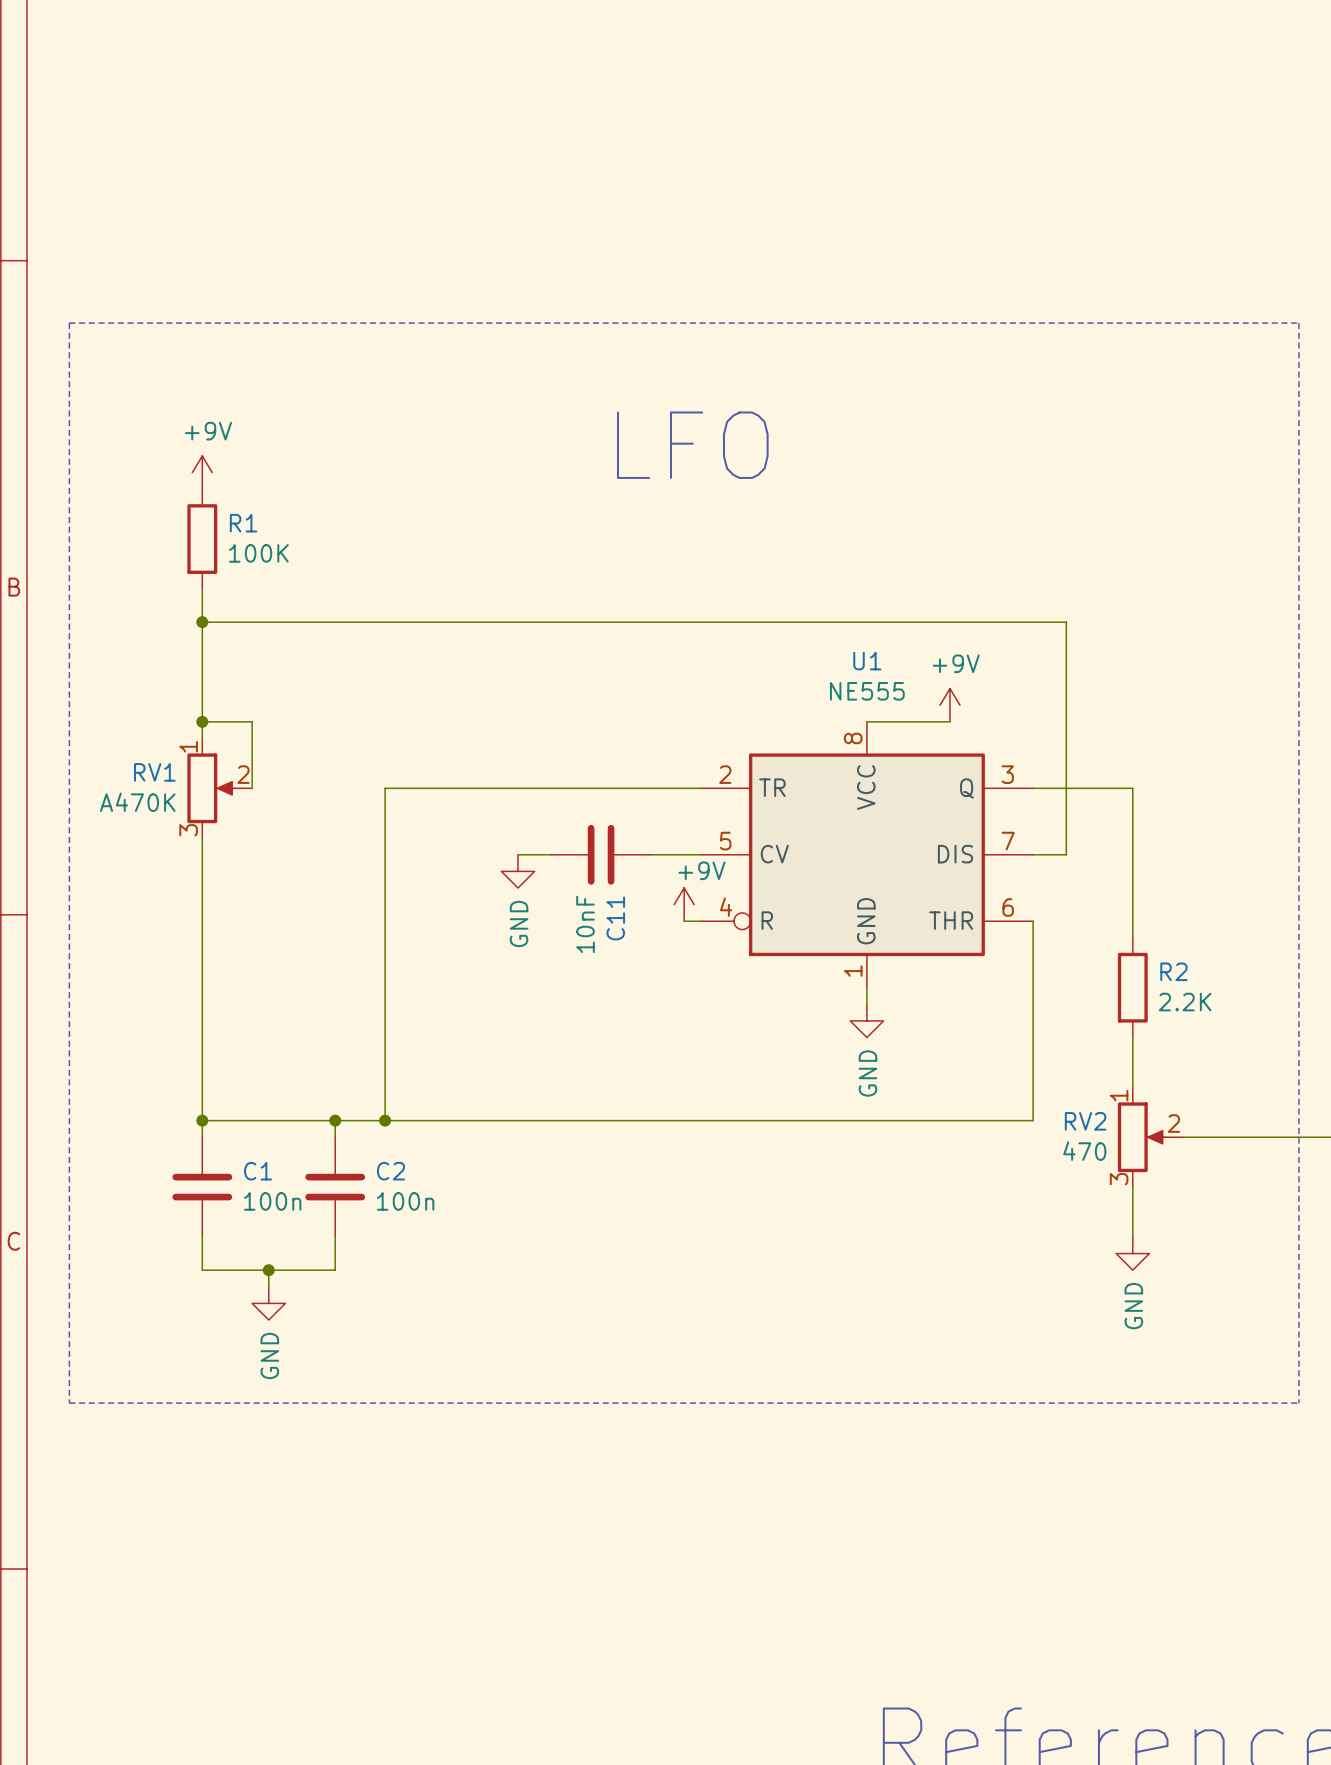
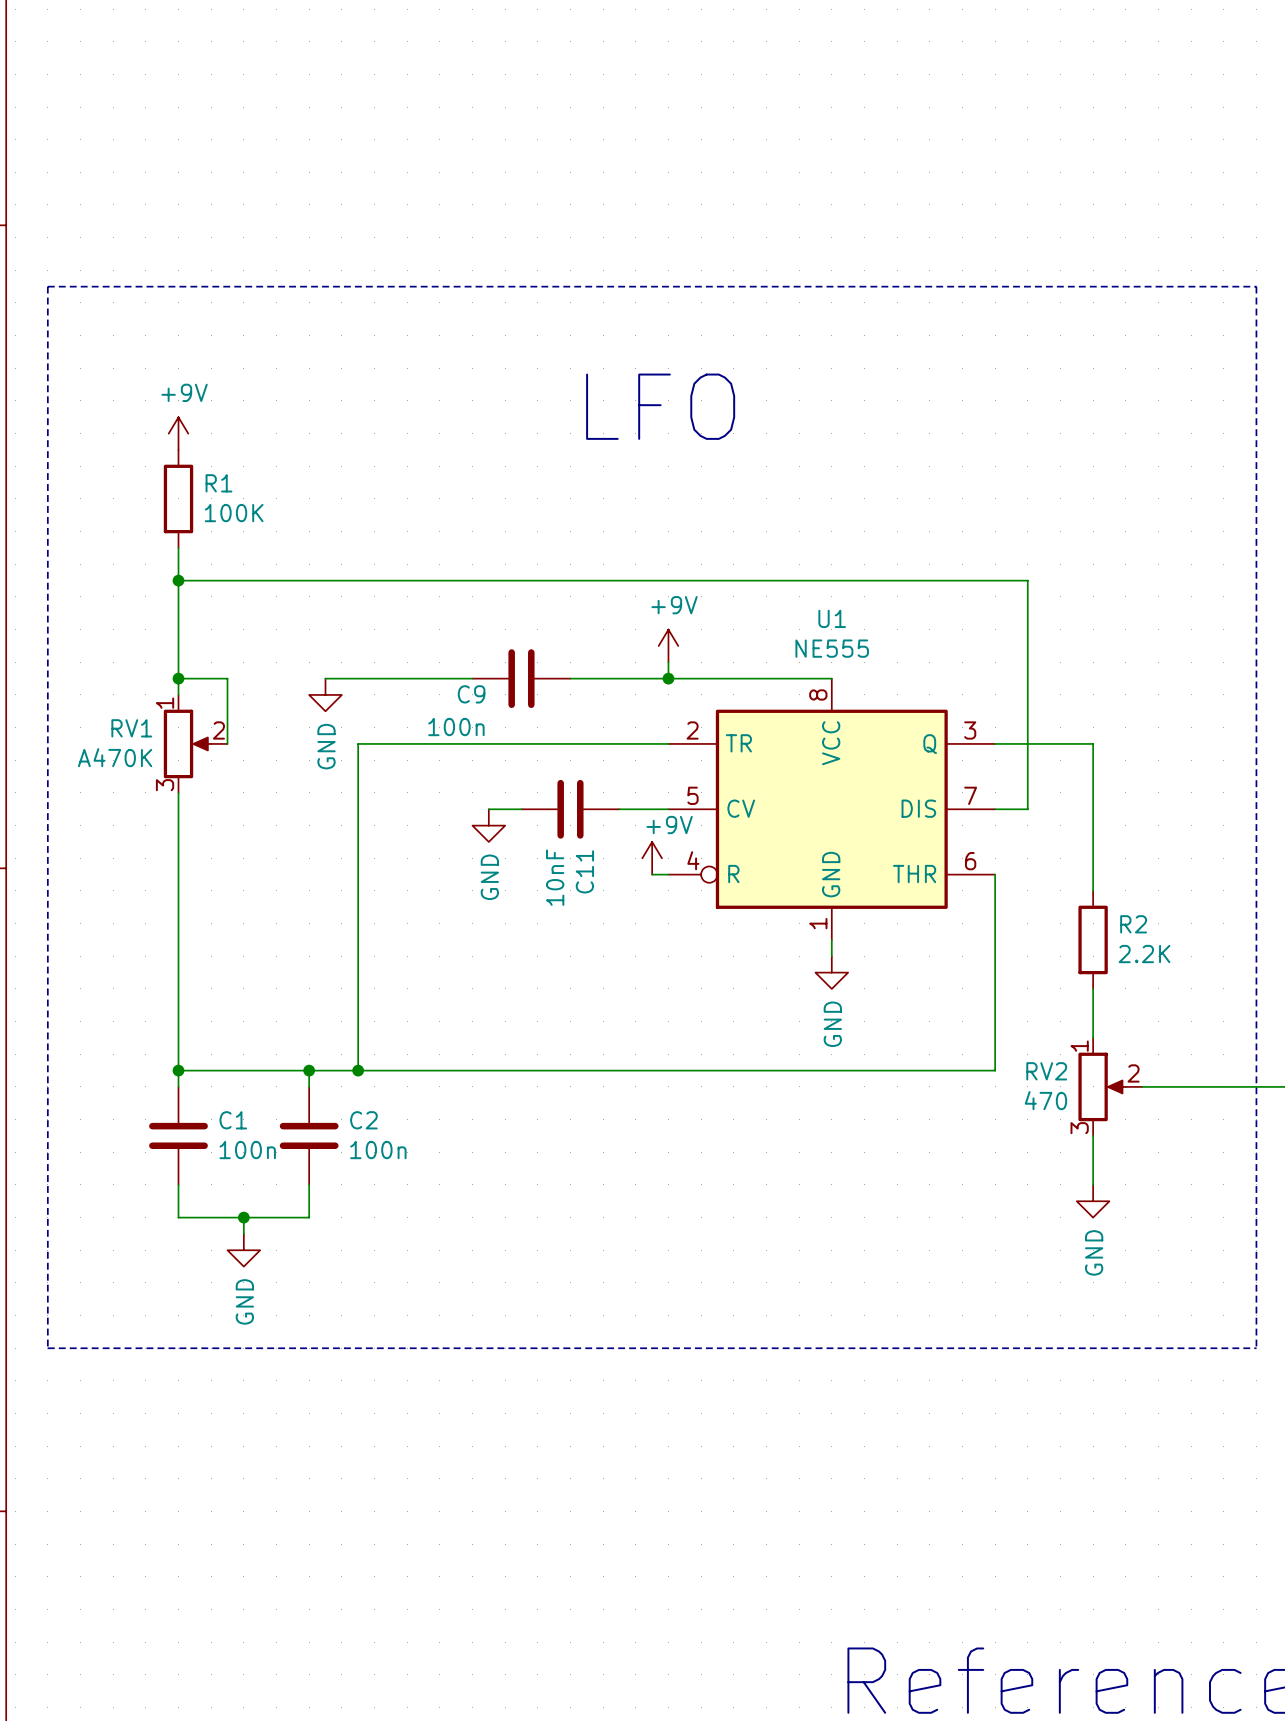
wire: none -> (668, 662) (668, 678)
power symbol position: +9V (950, 705) -> +9V (668, 645)
wire: none -> (325, 678) (472, 678)
C9: none -> 100n (521, 678)
junction: none -> (668, 678)
wire: (866, 721) (950, 721) -> (831, 678) (570, 678)
power symbol: none -> GND (325, 694)

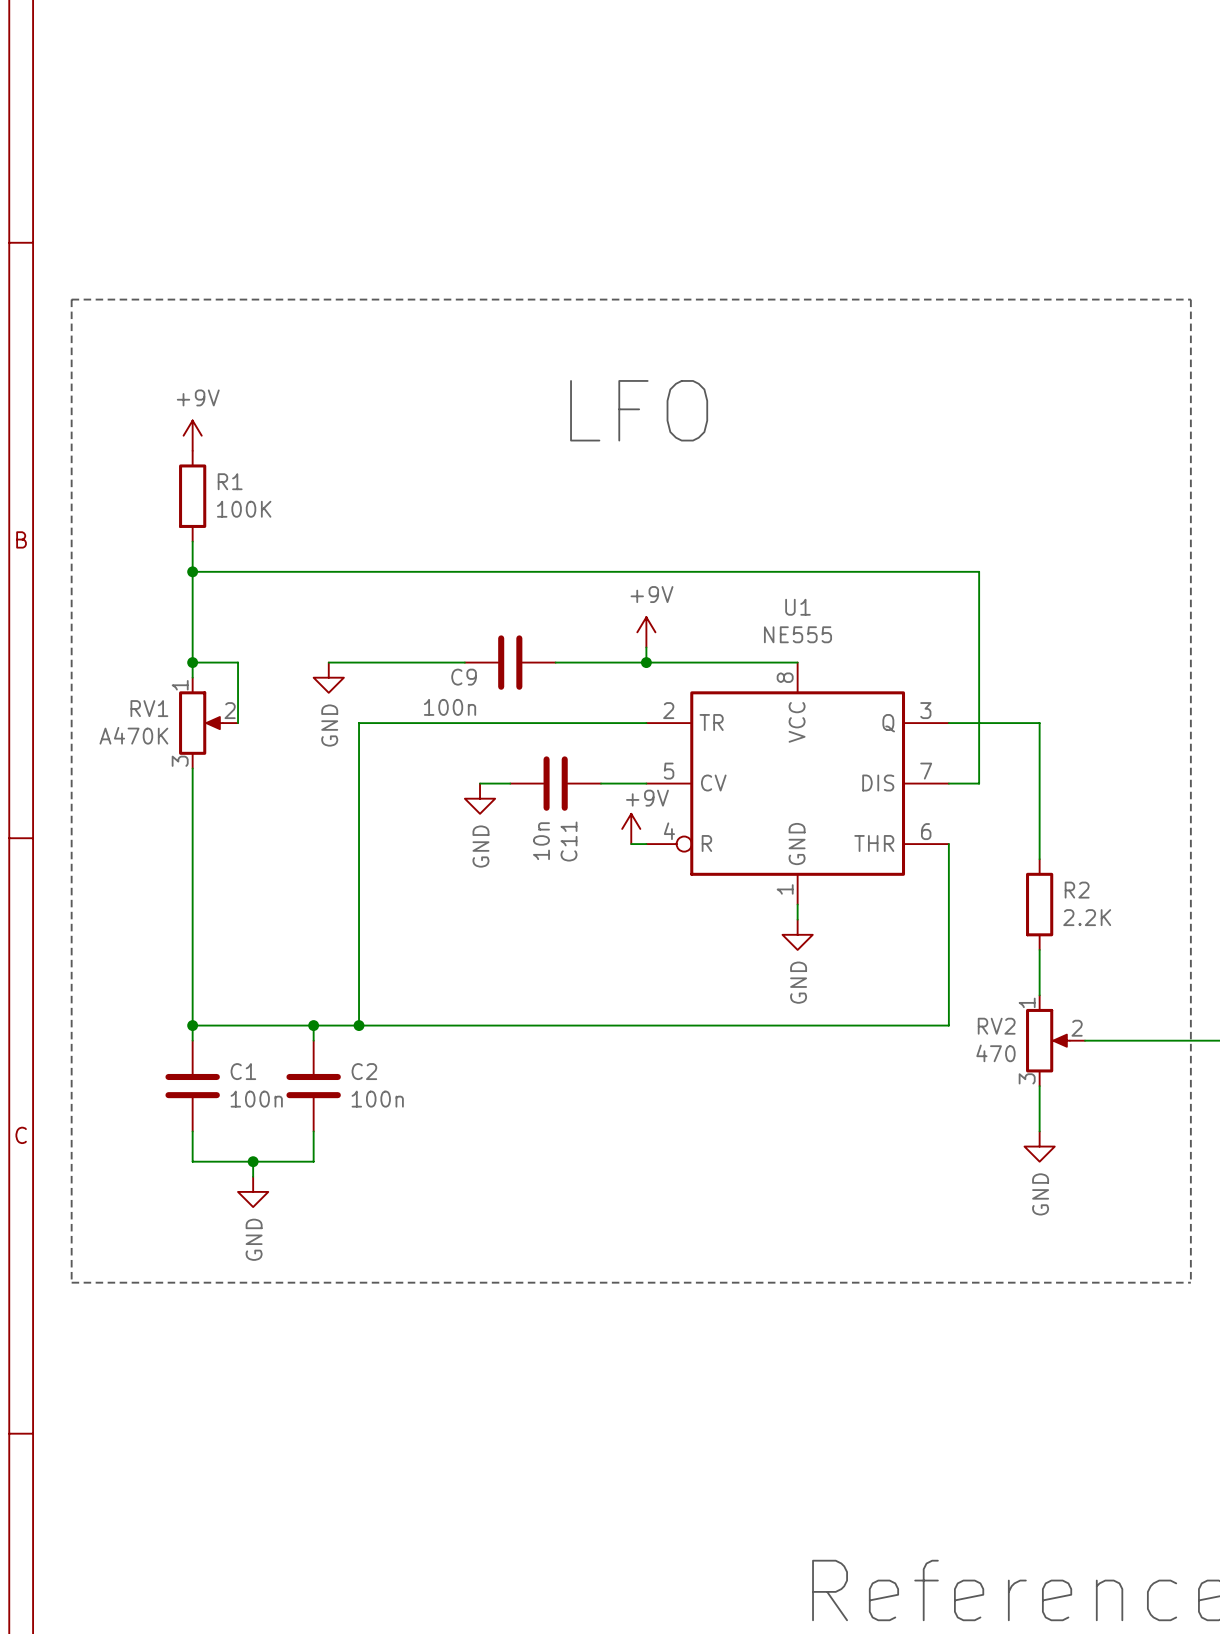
C11 value: 10nF (555, 877) -> 10n (541, 841)

